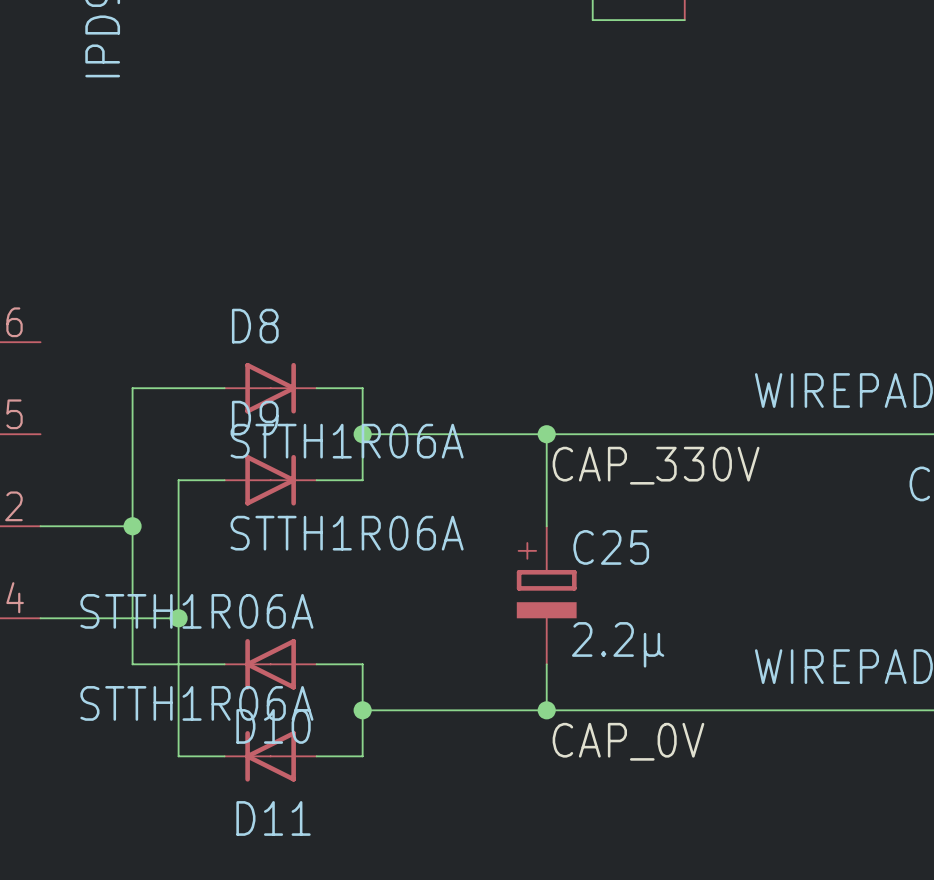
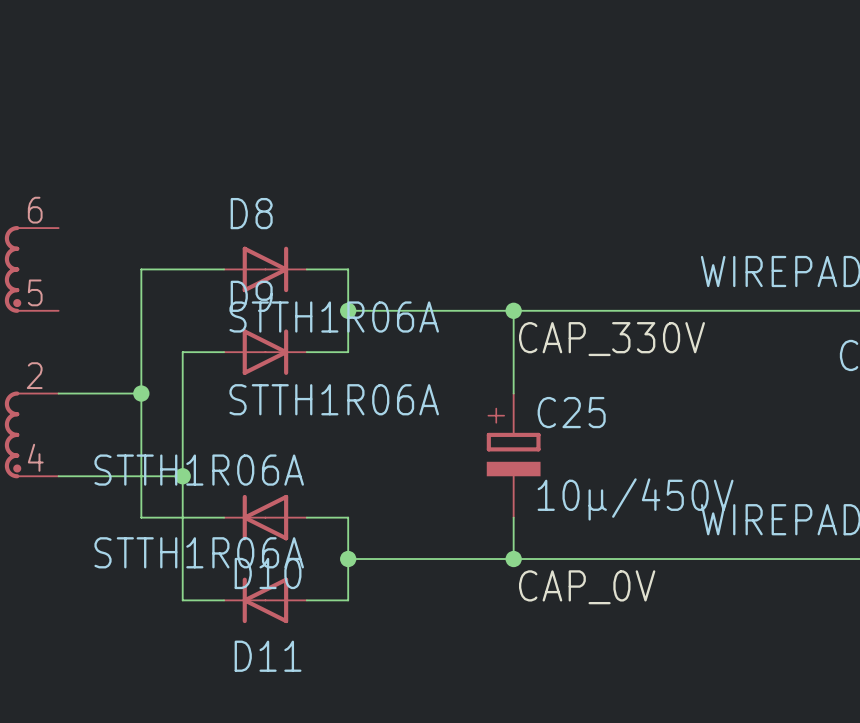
C25 value: 2.2µ (618, 644) -> 10µ/450V (635, 499)

